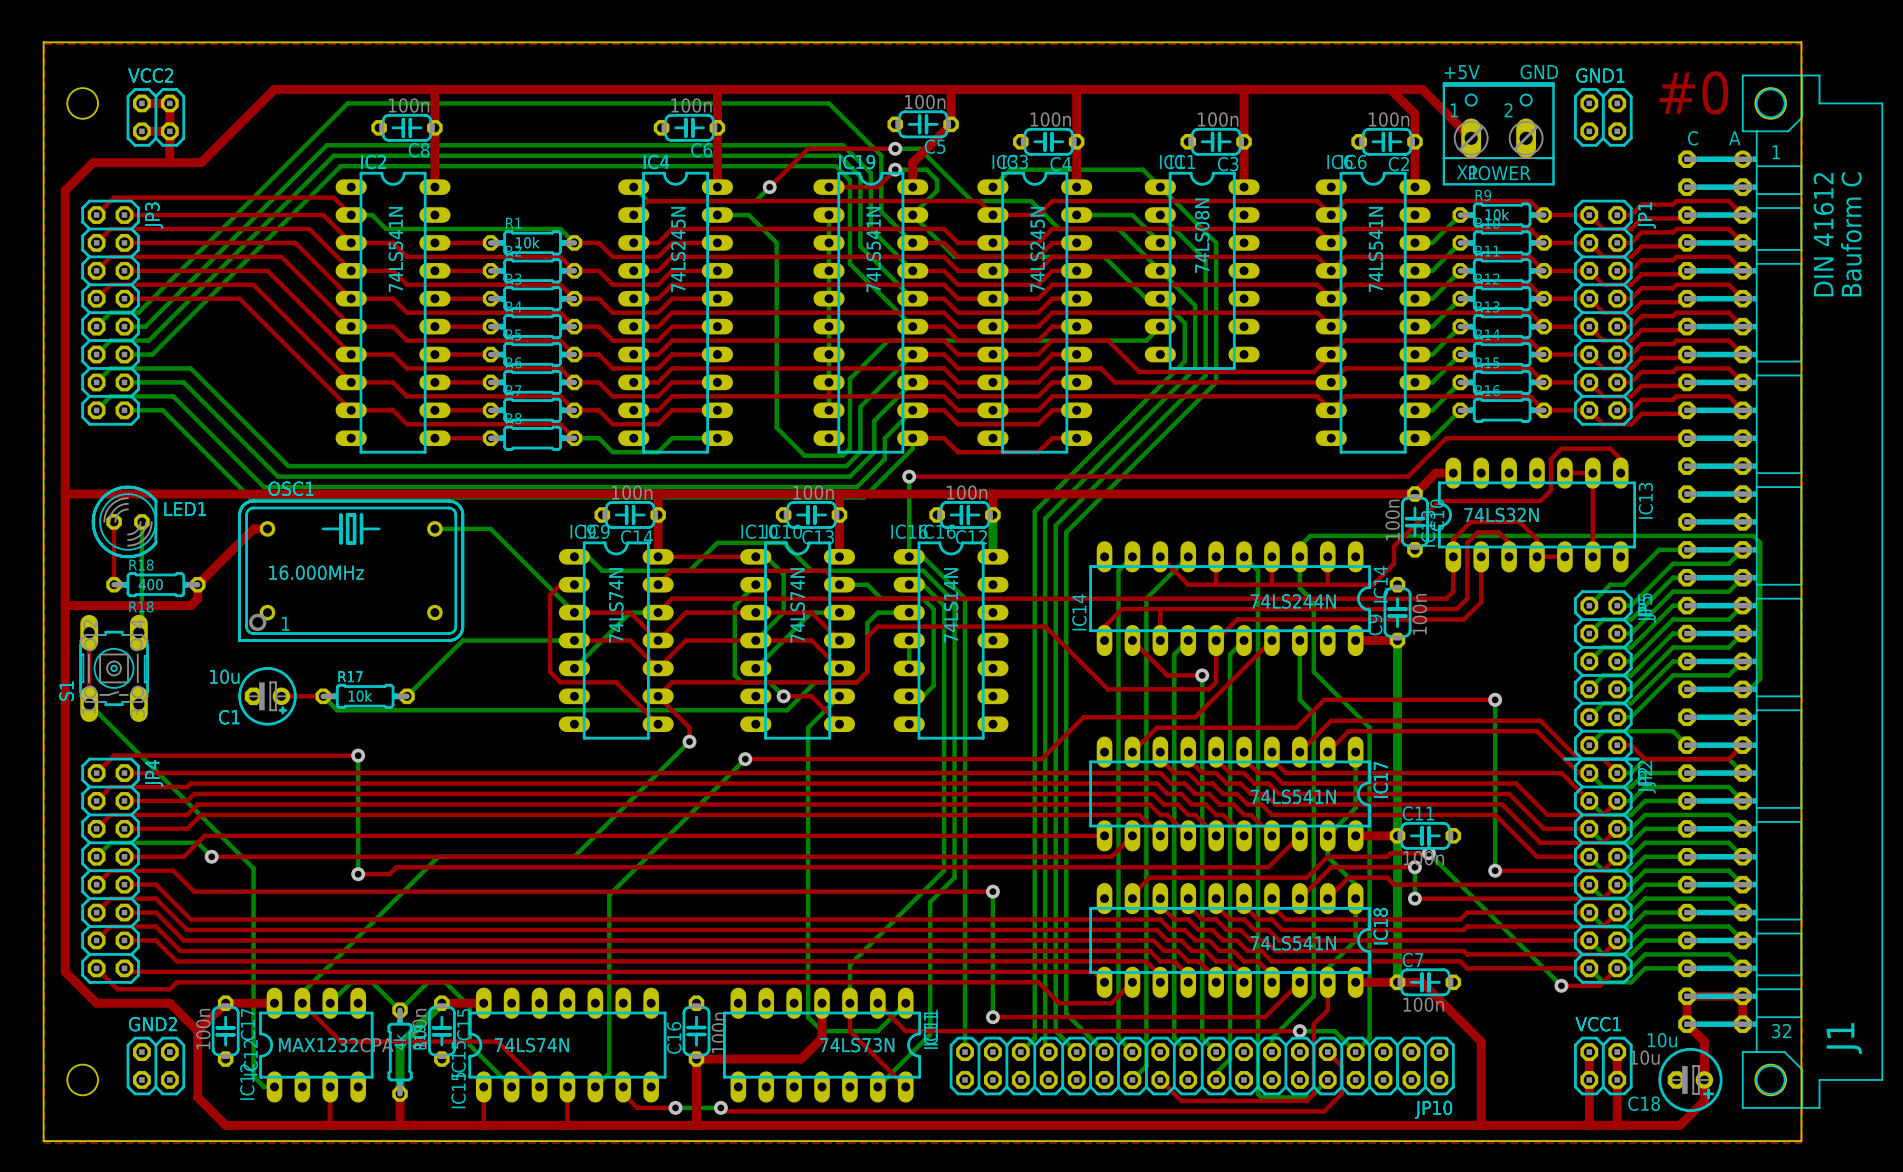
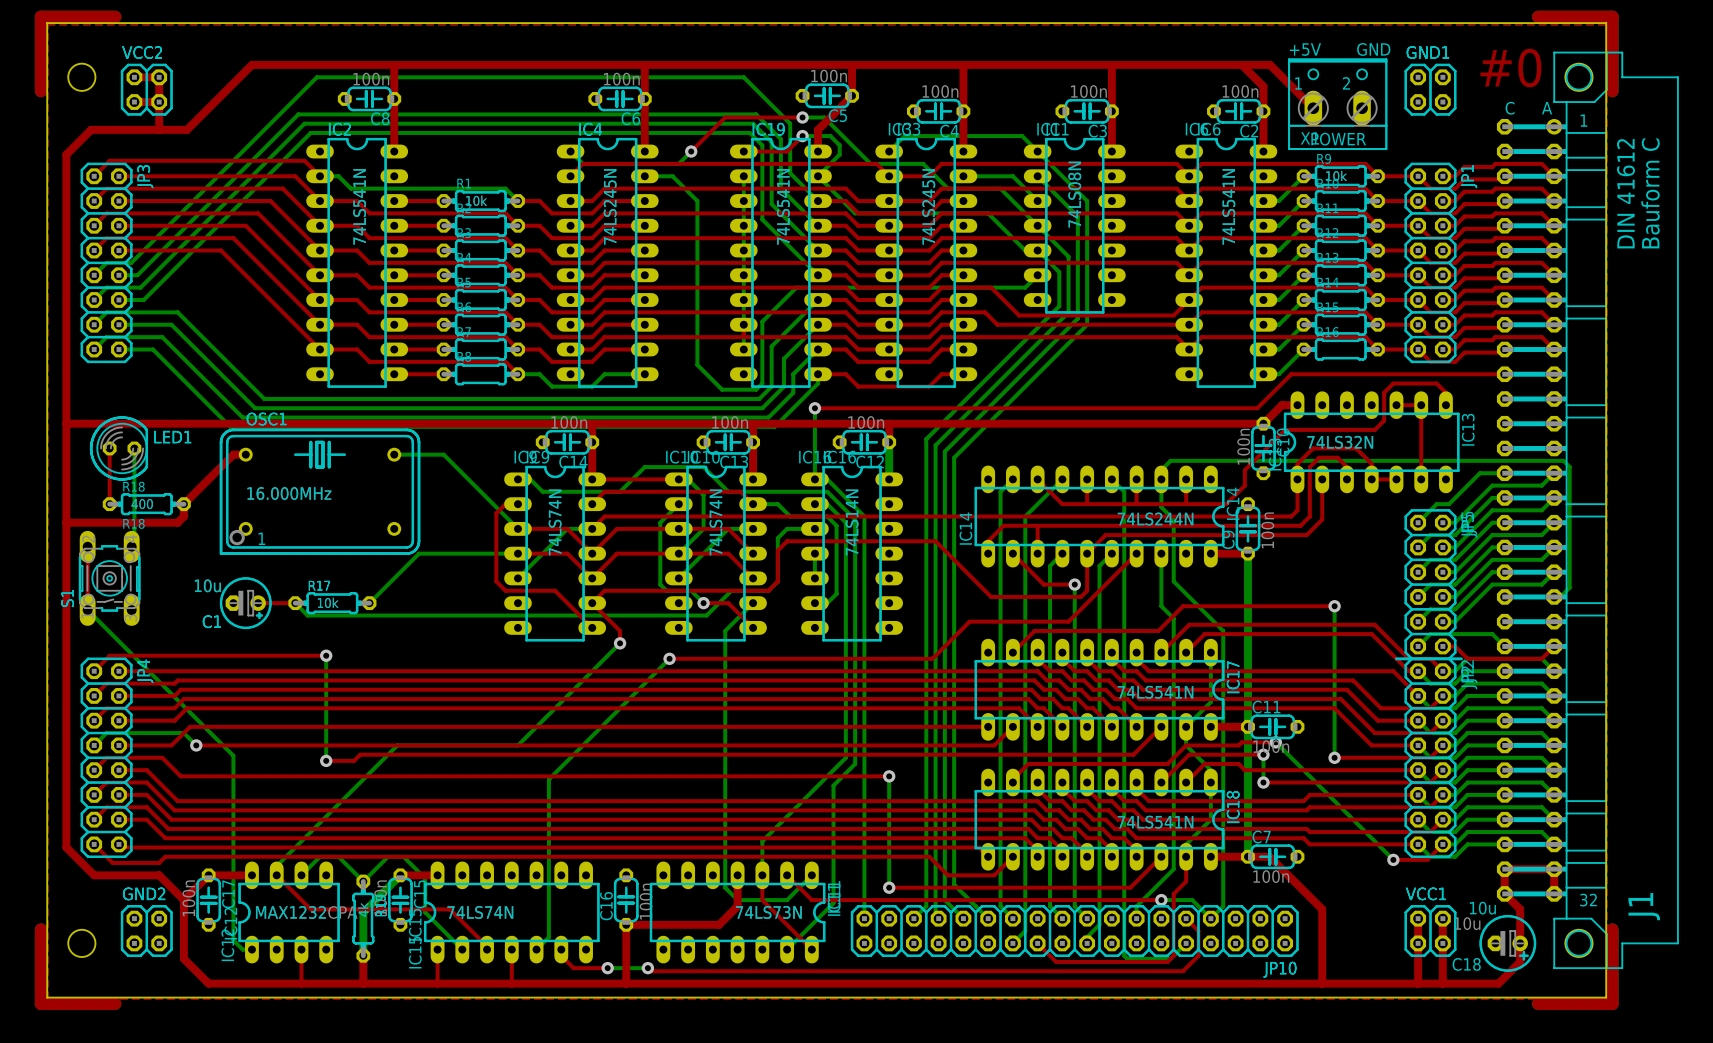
J1 footprint: [43, 42, 1884, 1142] -> [34, 10, 1679, 1010]

